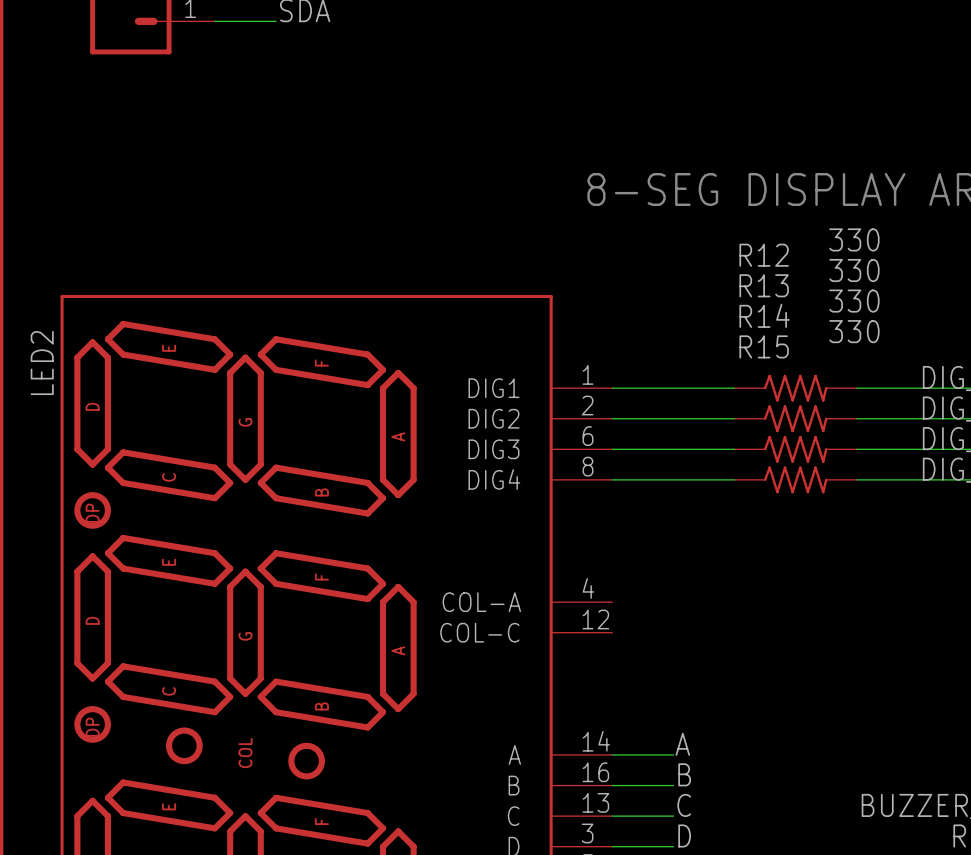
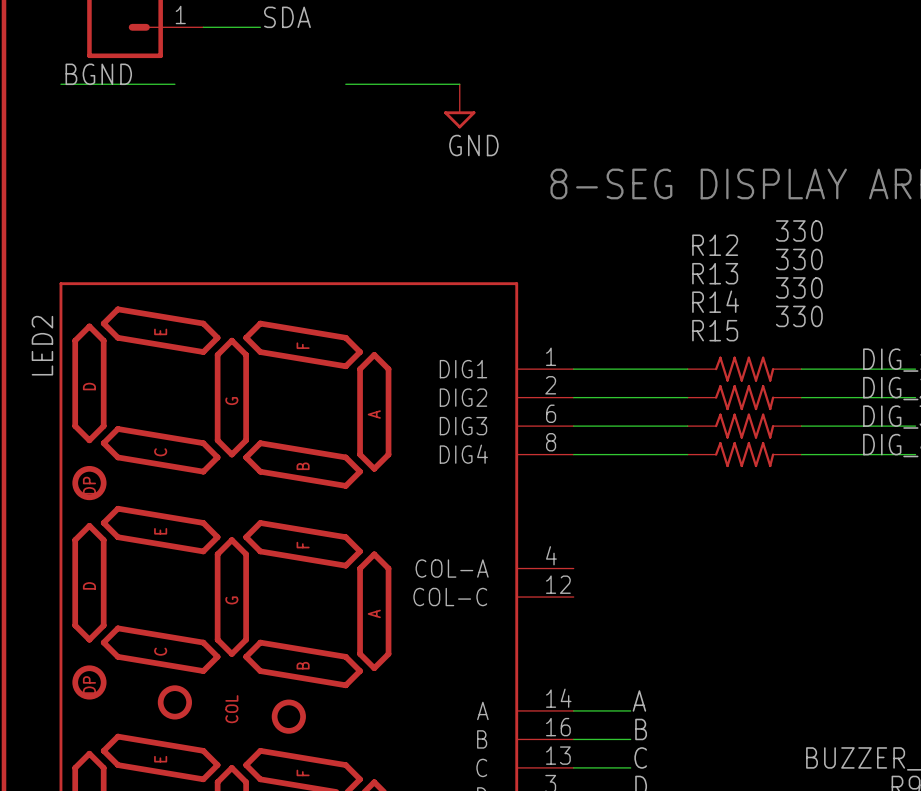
label: none -> BGND (98, 74)
wire: none -> (60, 84) (174, 84)
wire: none -> (345, 84) (459, 84)
power symbol: none -> GND (459, 106)

